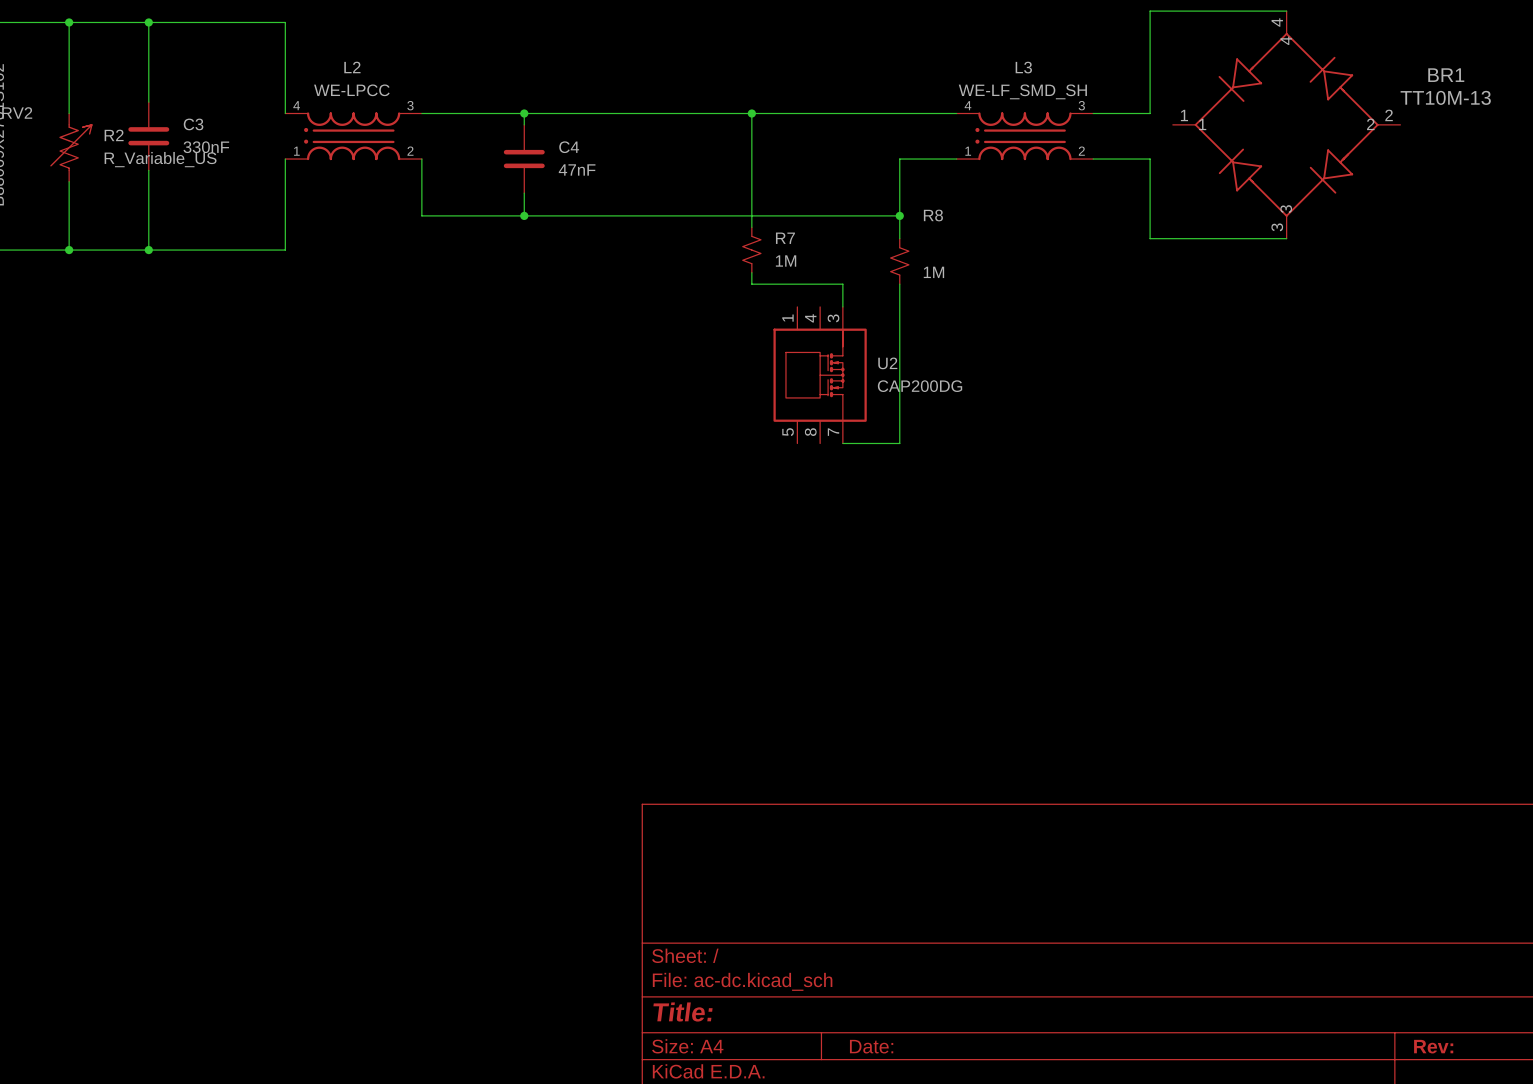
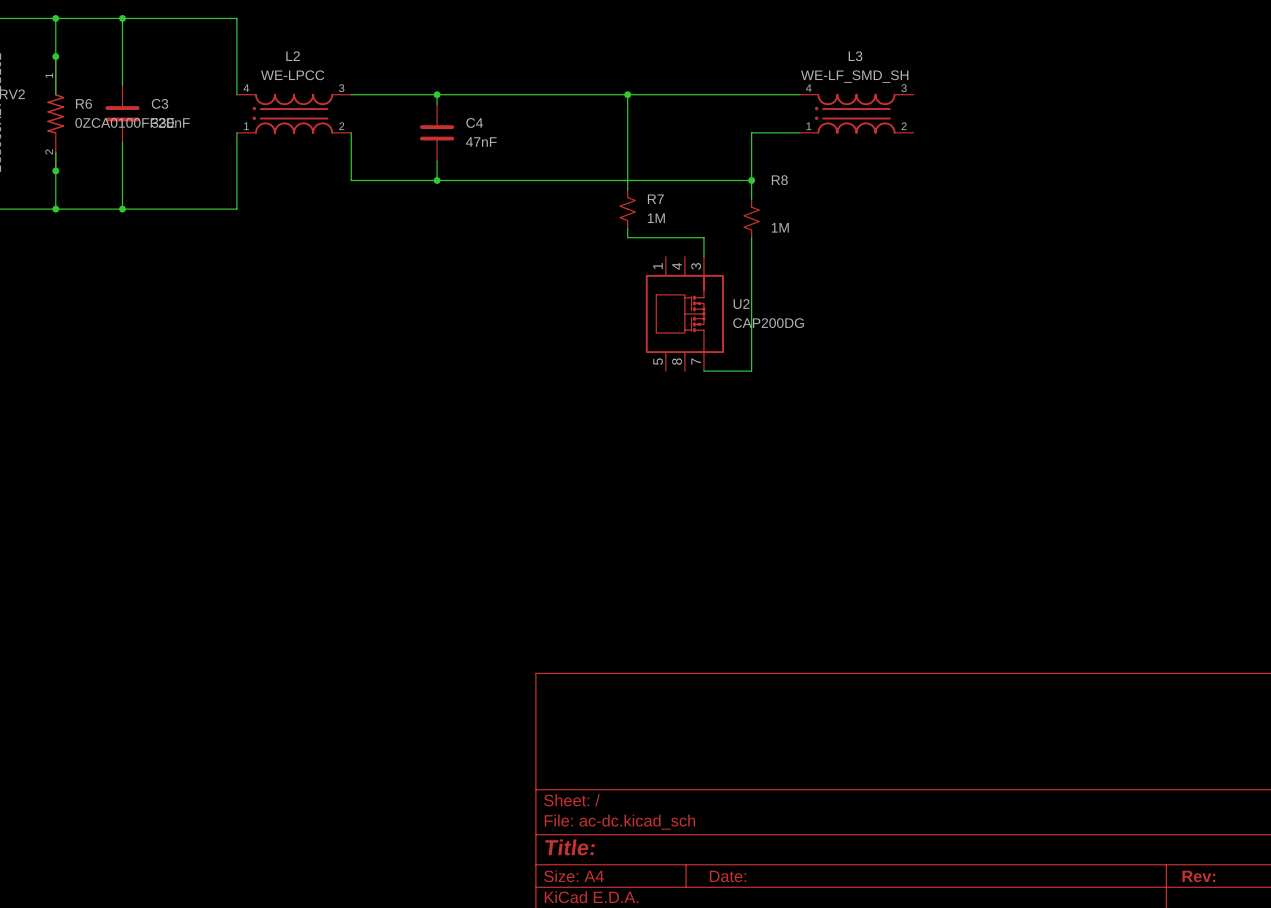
wire: (1286, 11) (1150, 11) (1150, 113) (1093, 113) -> none
junction: none -> (55, 56)
BR1: TT10M-13 (1286, 124) -> none
R6: none -> 0ZCA0100FF2E (55, 113)
R2: R_Variable_US (71, 147) -> none
wire: (1093, 159) (1150, 159) (1150, 238) (1286, 238) -> none
junction: none -> (55, 170)

